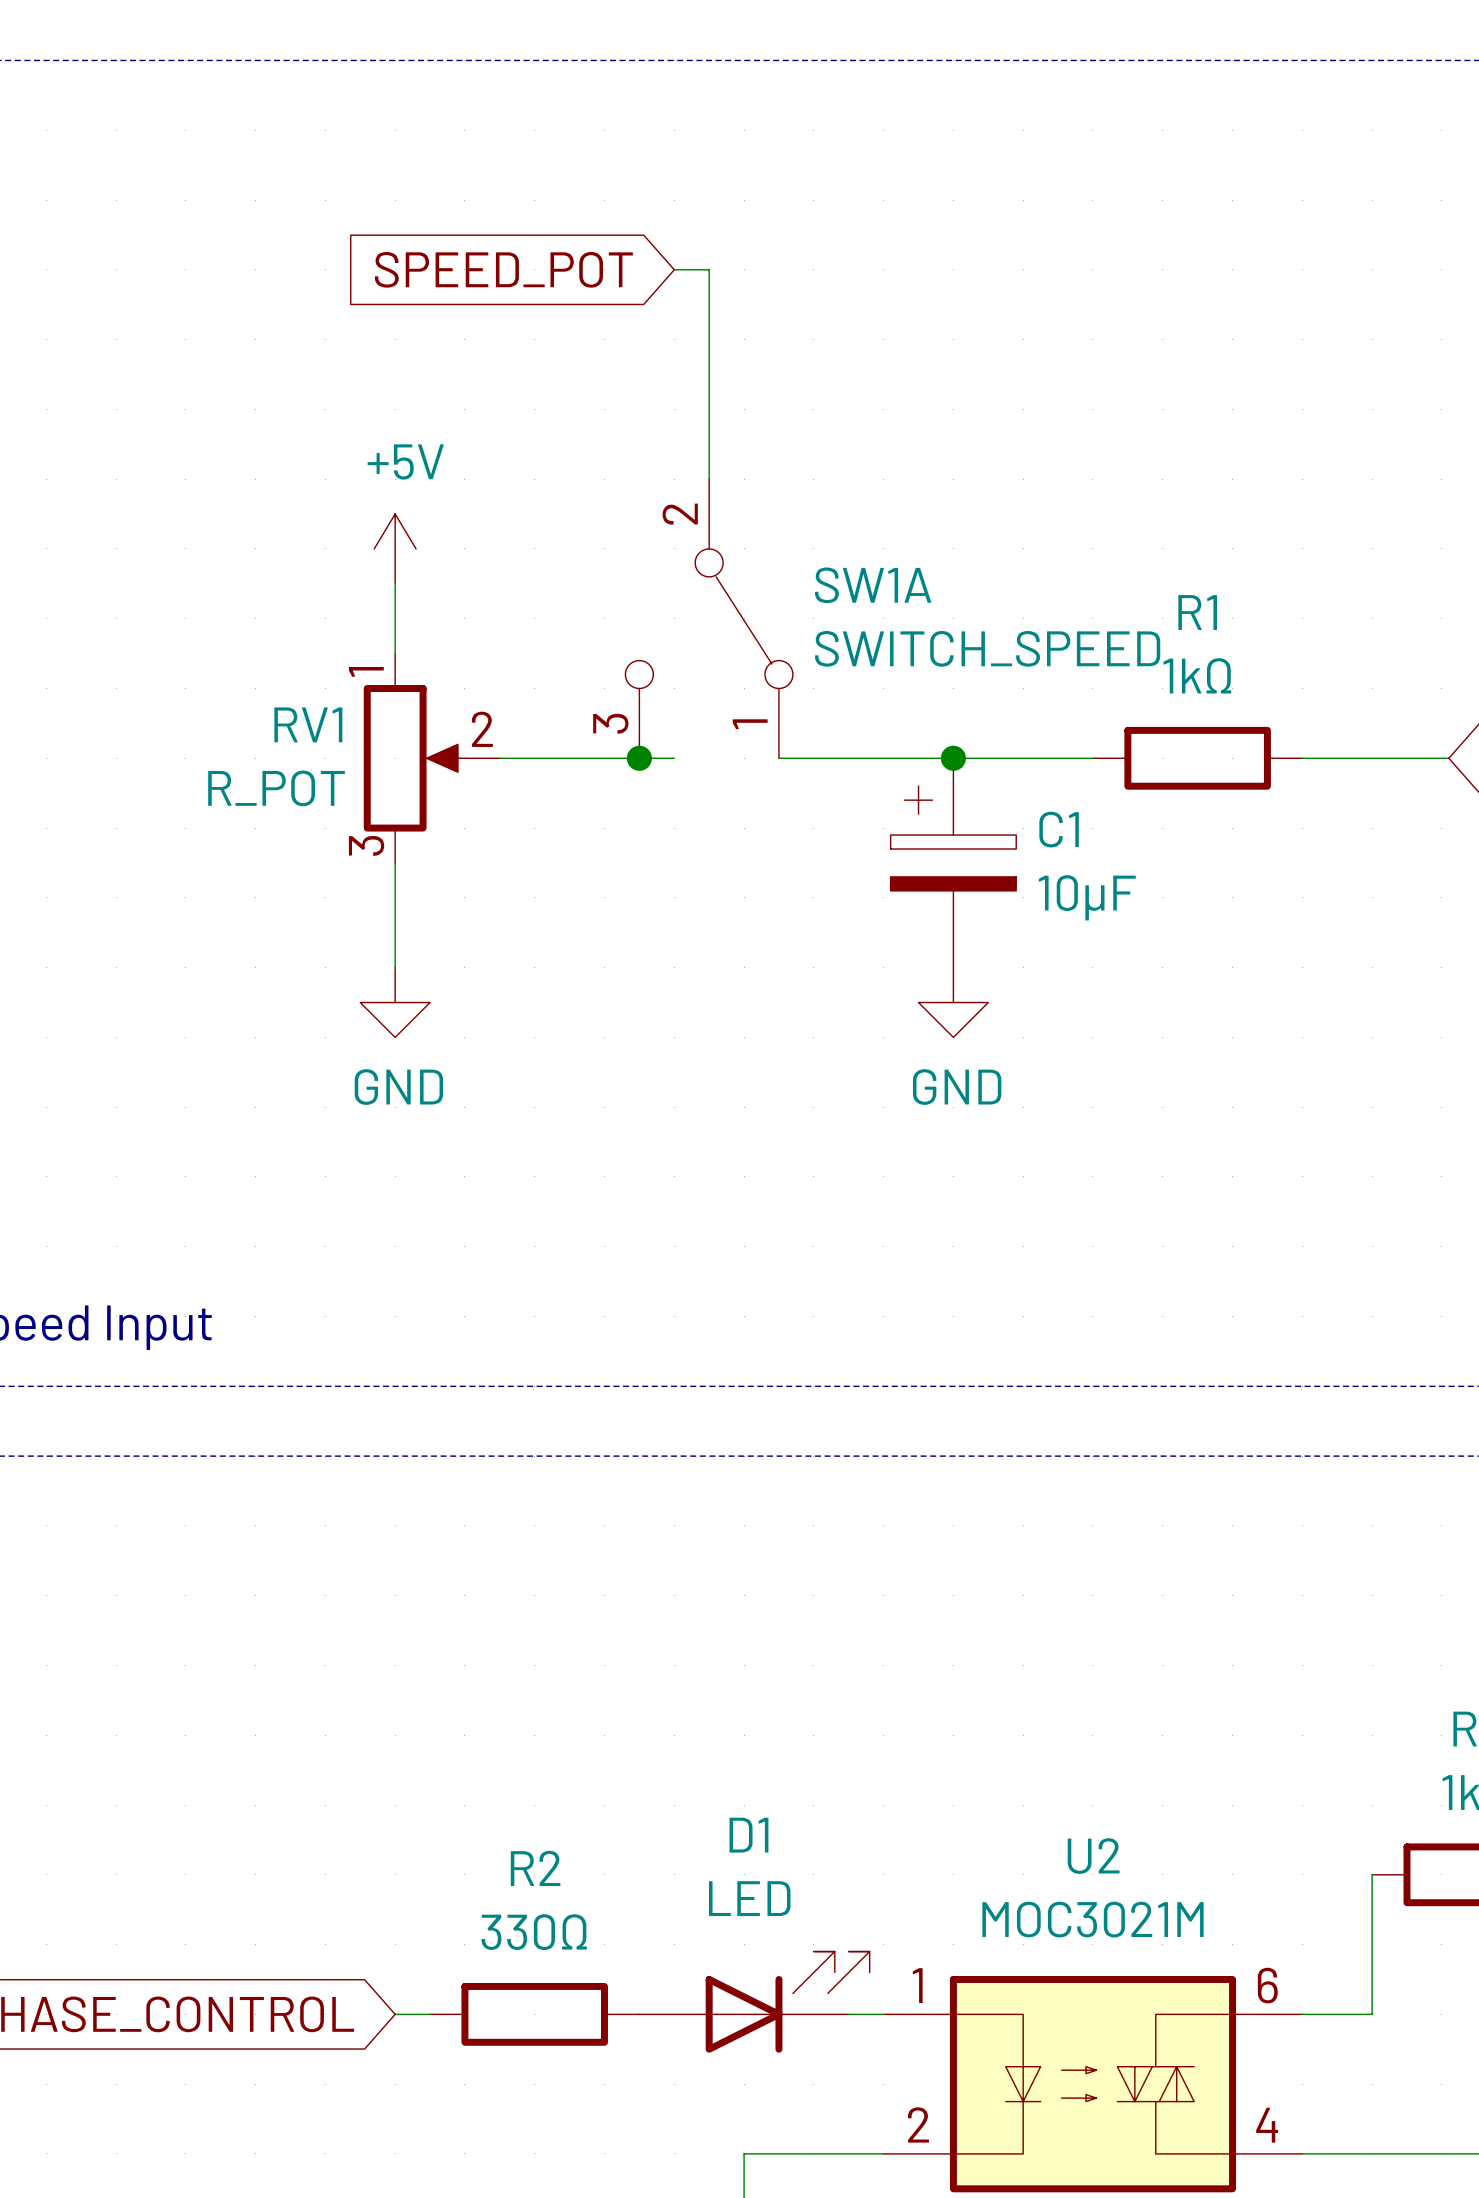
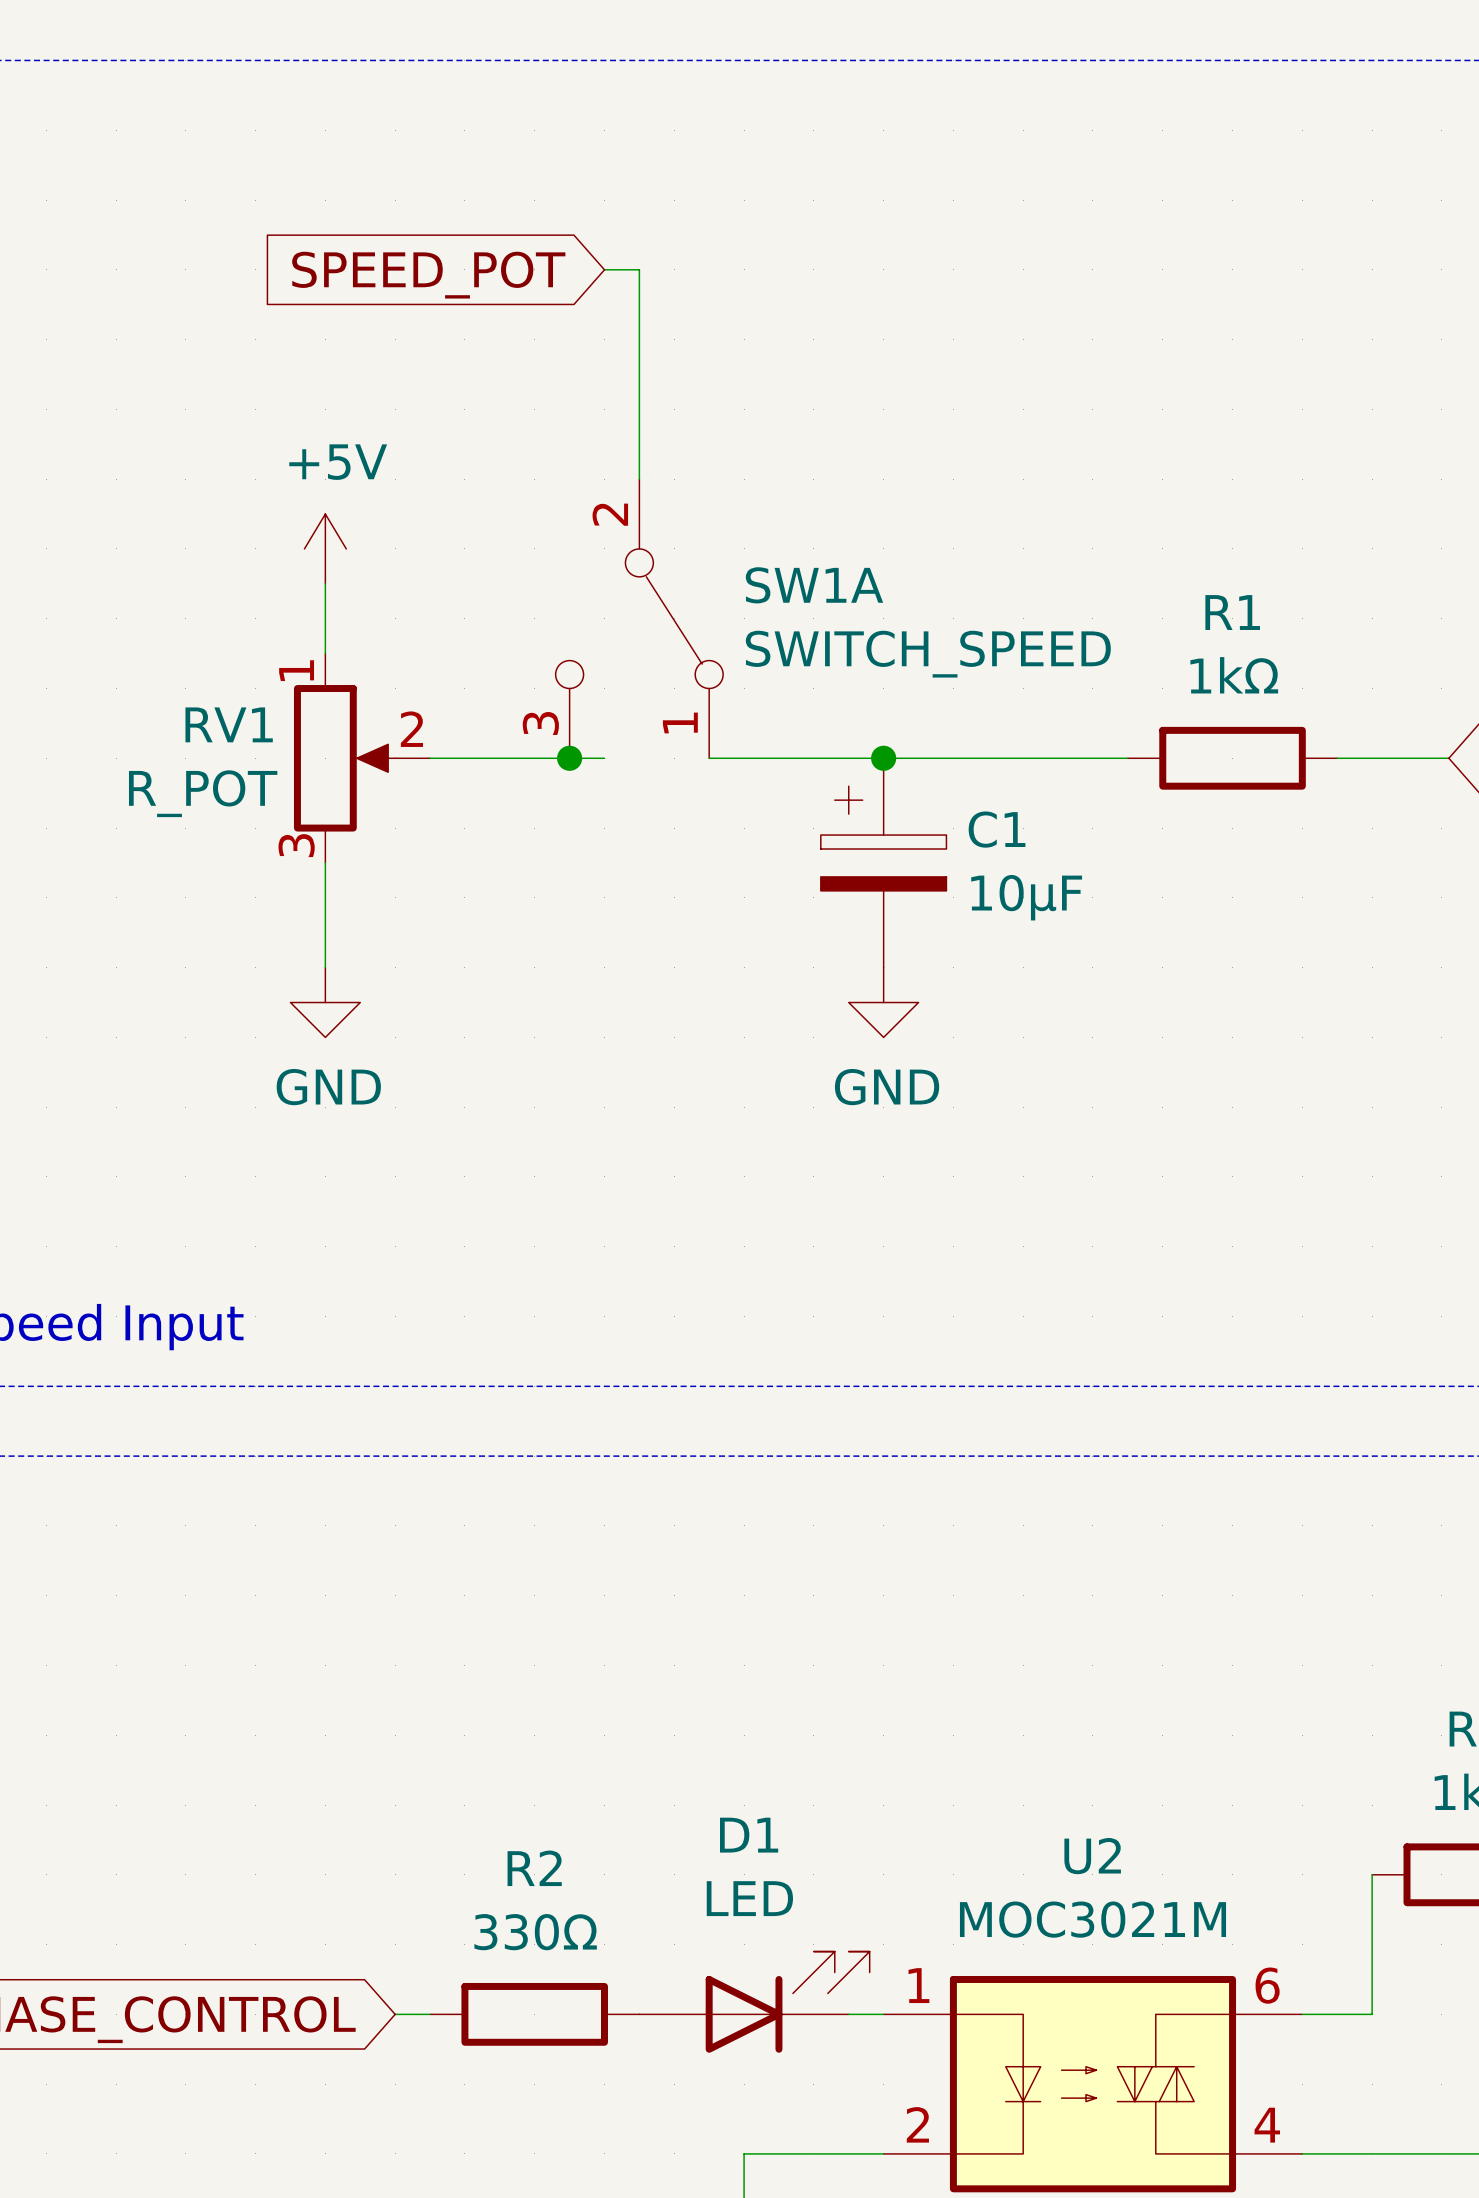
global label position: SPEED_POT (503, 269) -> SPEED_POT (428, 275)
wire: (674, 269) (709, 269) (709, 479) -> (604, 269) (639, 269) (639, 479)
power symbol position: +5V (395, 548) -> +5V (325, 548)
wire: (395, 583) (395, 653) -> (325, 583) (325, 653)
SW1A position: (709, 618) -> (639, 618)
RV1 position: (431, 758) -> (362, 758)
wire: (604, 758) (674, 758) -> (709, 758) (778, 758)
junction position: (639, 758) -> (569, 758)
junction position: (953, 758) -> (883, 758)
R1 position: (1197, 758) -> (1232, 758)
wire: (395, 862) (395, 967) -> (325, 862) (325, 967)
C1 position: (953, 862) -> (883, 862)
power symbol position: GND (395, 1002) -> GND (325, 1002)
power symbol position: GND (953, 1002) -> GND (883, 1002)

